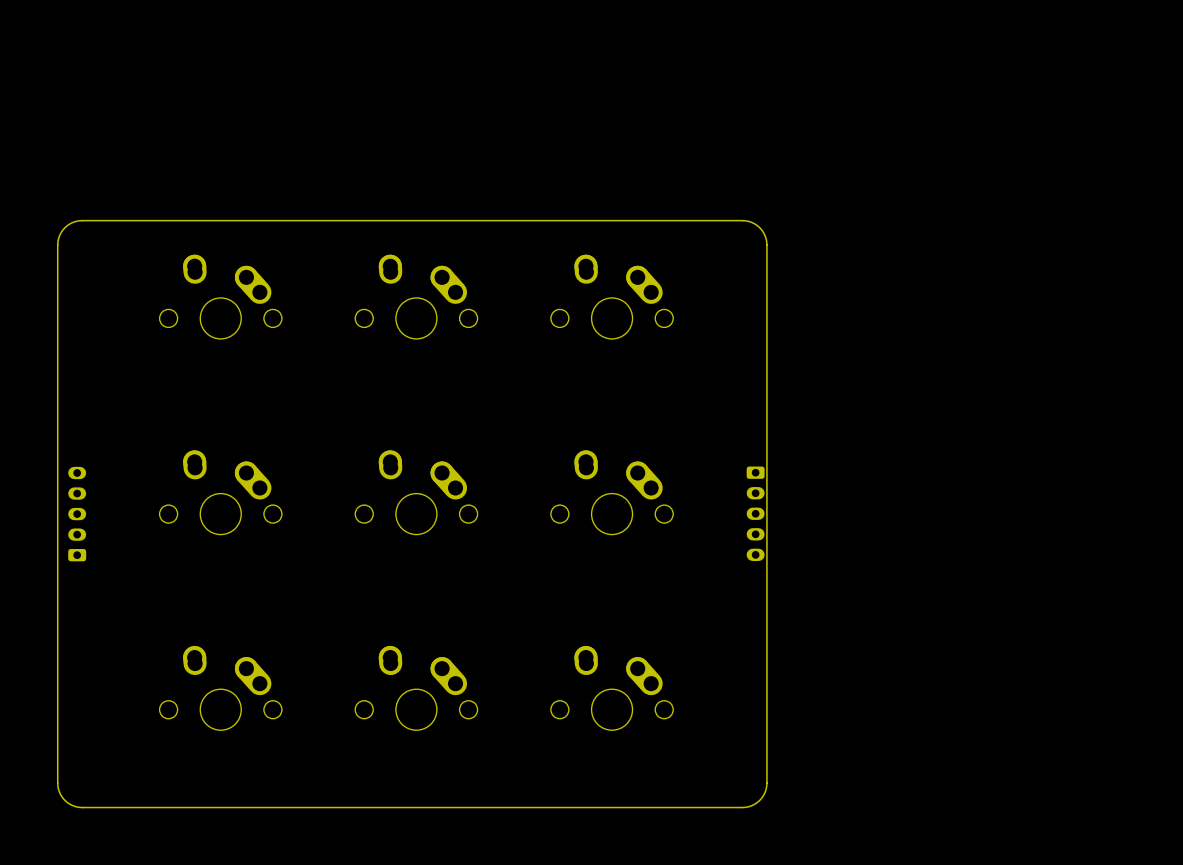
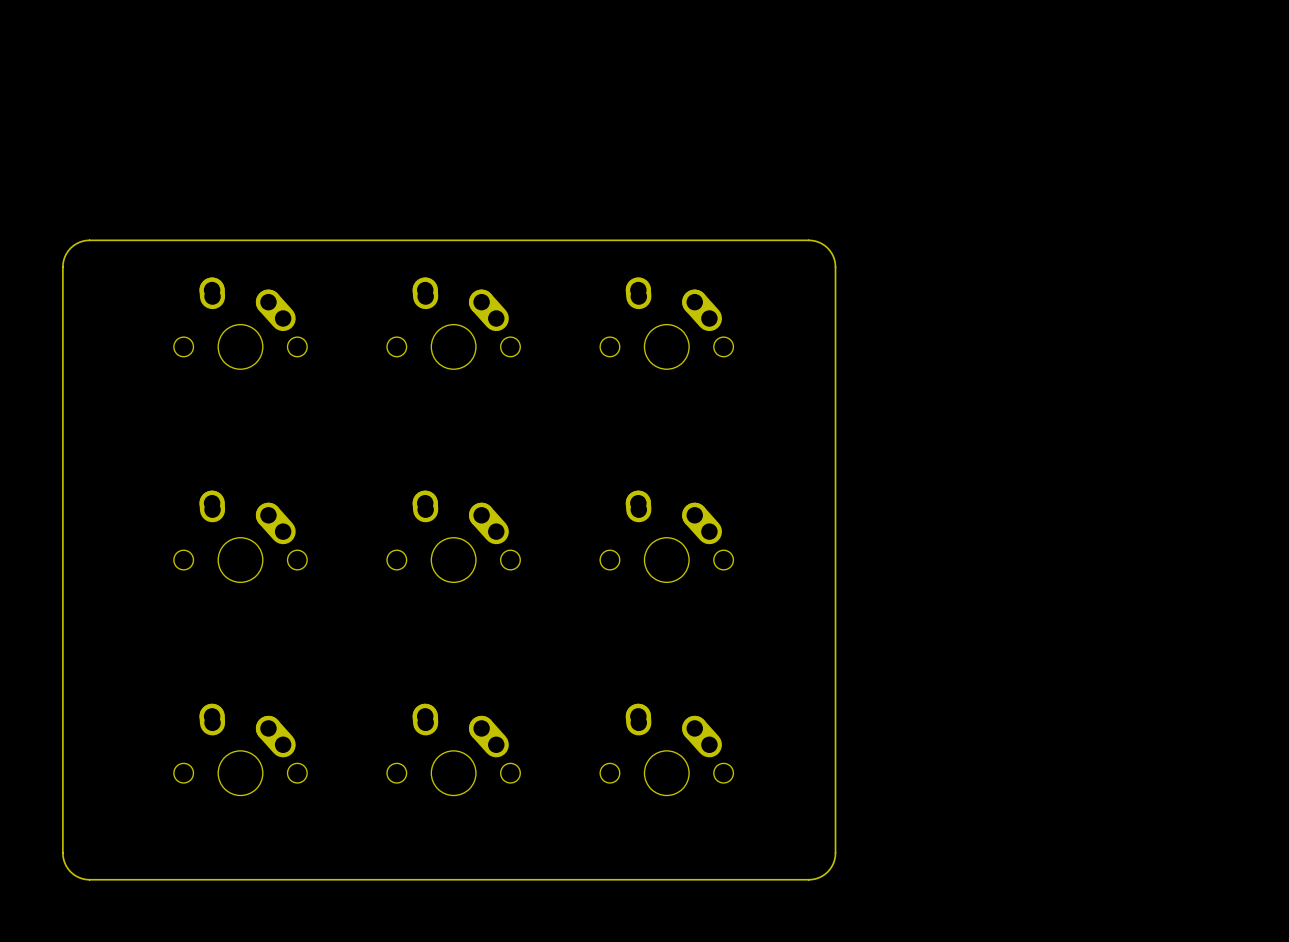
part: (755, 513) -> none
part: (77, 514) -> none

